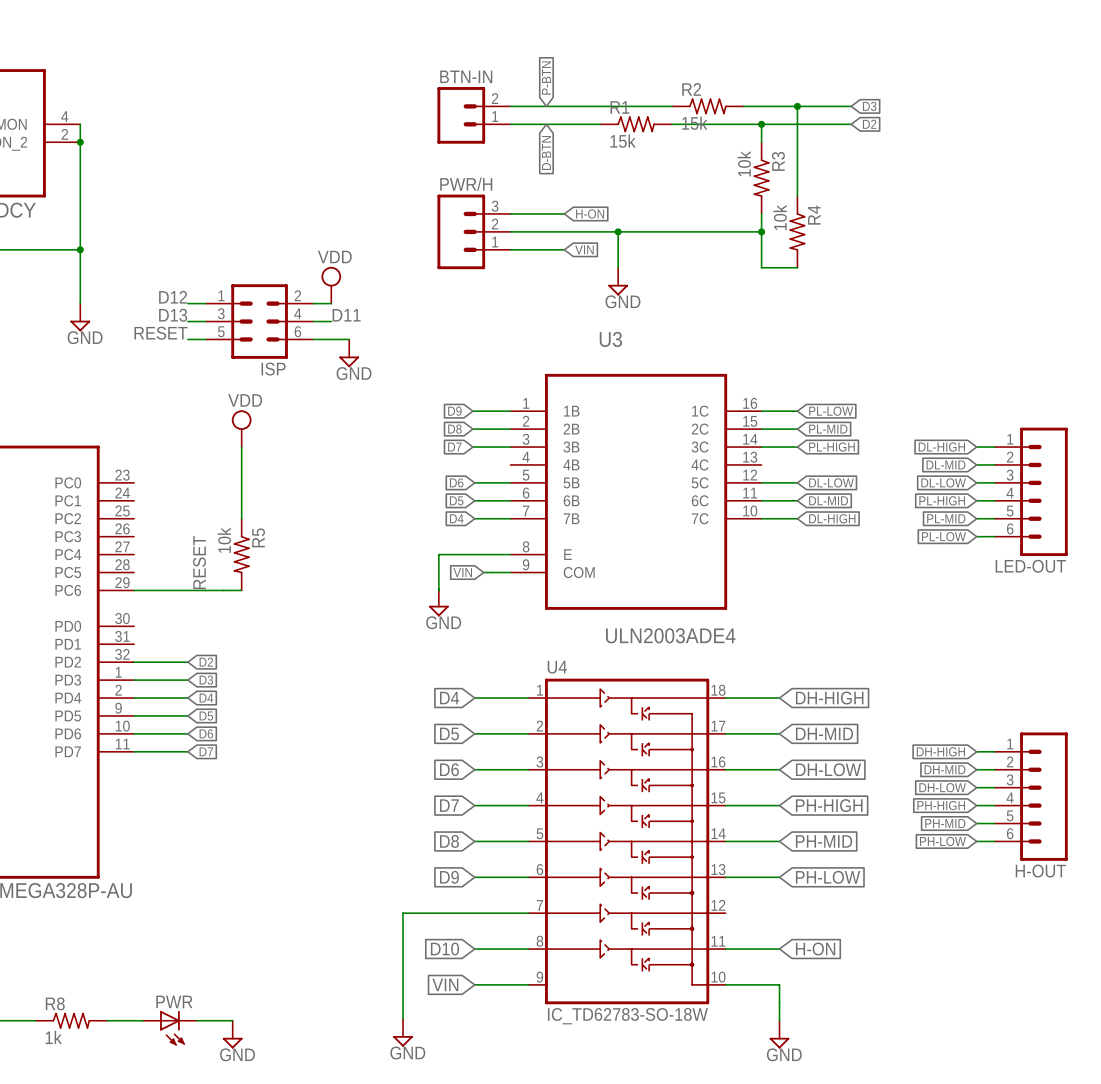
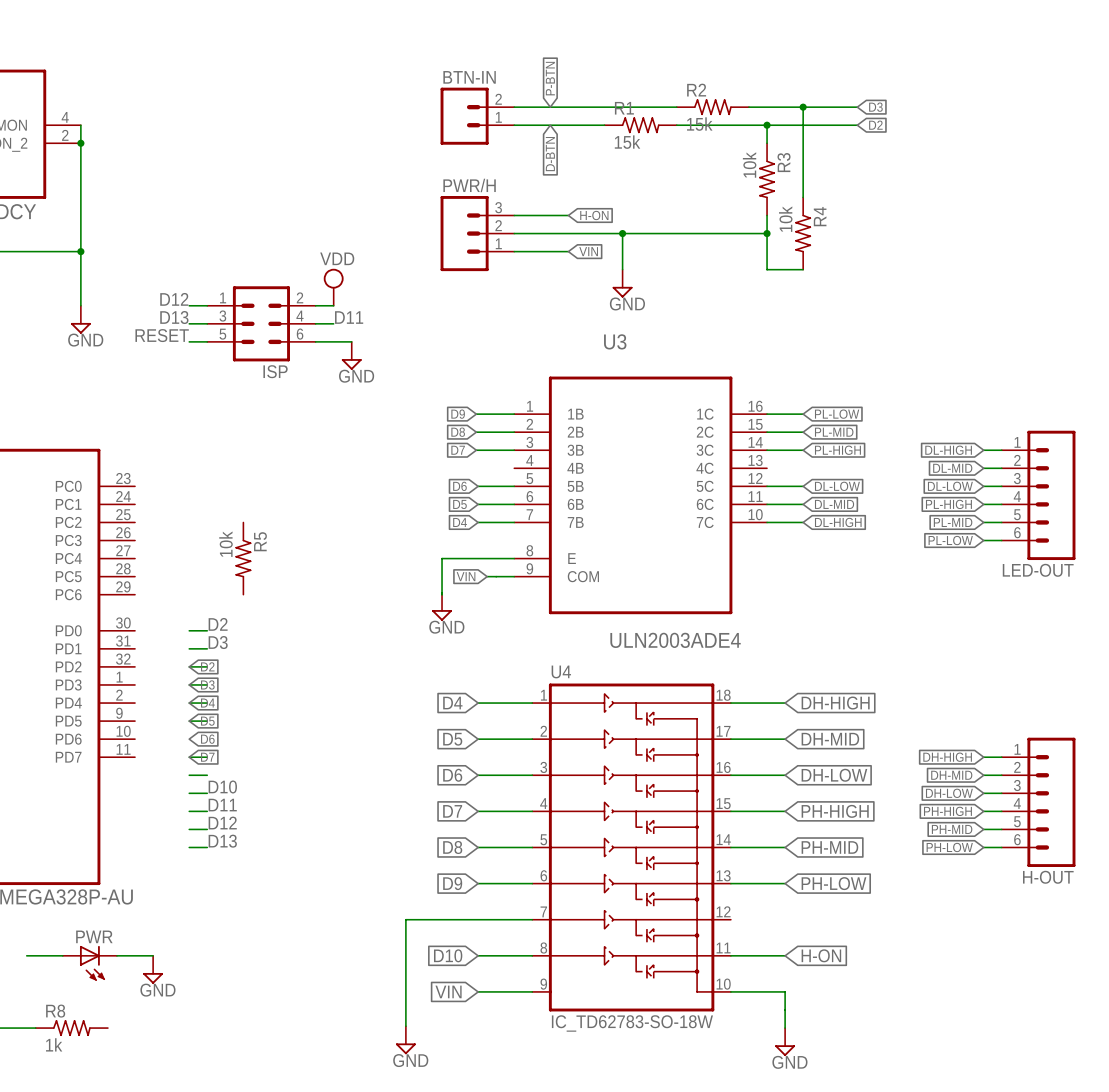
power symbol: VDD (241, 428) -> none
wire: (241, 447) (241, 518) -> none
label: RESET (199, 562) -> none
wire: (134, 590) (241, 590) -> none
label: none -> D2 (218, 624)
wire: none -> (189, 630) (207, 630)
label: none -> D3 (218, 642)
wire: none -> (189, 648) (207, 648)
wire: (134, 662) (187, 662) -> (207, 666) (189, 666)
wire: (134, 680) (187, 680) -> (207, 684) (189, 684)
wire: (134, 698) (187, 698) -> (207, 703) (189, 703)
wire: (134, 715) (187, 715) -> (207, 721) (189, 721)
wire: (134, 733) (187, 733) -> none
wire: (134, 751) (187, 751) -> (207, 757) (189, 757)
wire: none -> (189, 775) (207, 775)
label: none -> D10 (222, 786)
wire: none -> (189, 793) (207, 793)
label: none -> D11 (222, 805)
wire: none -> (189, 811) (207, 811)
label: none -> D12 (222, 823)
wire: none -> (189, 829) (207, 829)
label: none -> D13 (222, 841)
wire: none -> (189, 847) (207, 847)
wire: (107, 1020) (143, 1020) -> (26, 955) (62, 955)
wire: (196, 1020) (232, 1020) -> (116, 955) (153, 955)
PWR position: (169, 1028) -> (89, 963)
power symbol position: GND (232, 1034) -> GND (153, 969)

